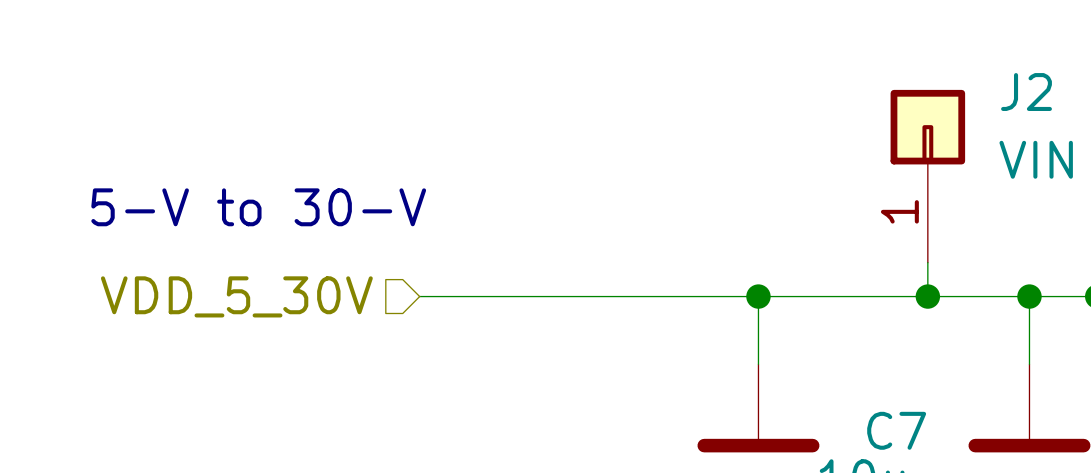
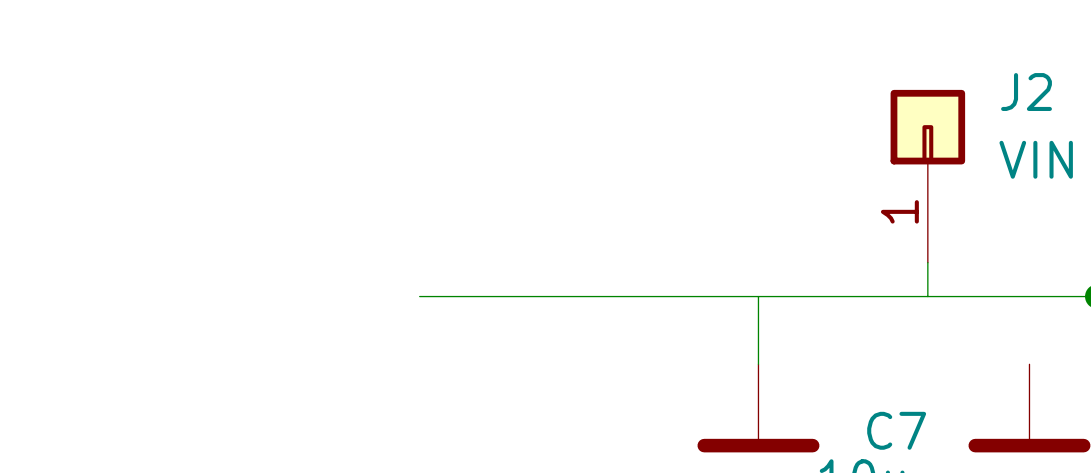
text: 5-V to 30-V (258, 207) -> none
hierarchical label: VDD_5_30V (236, 296) -> none
junction: (758, 296) -> none
junction: (927, 296) -> none
wire: (1029, 296) (1029, 364) -> none
junction: (1029, 296) -> none

